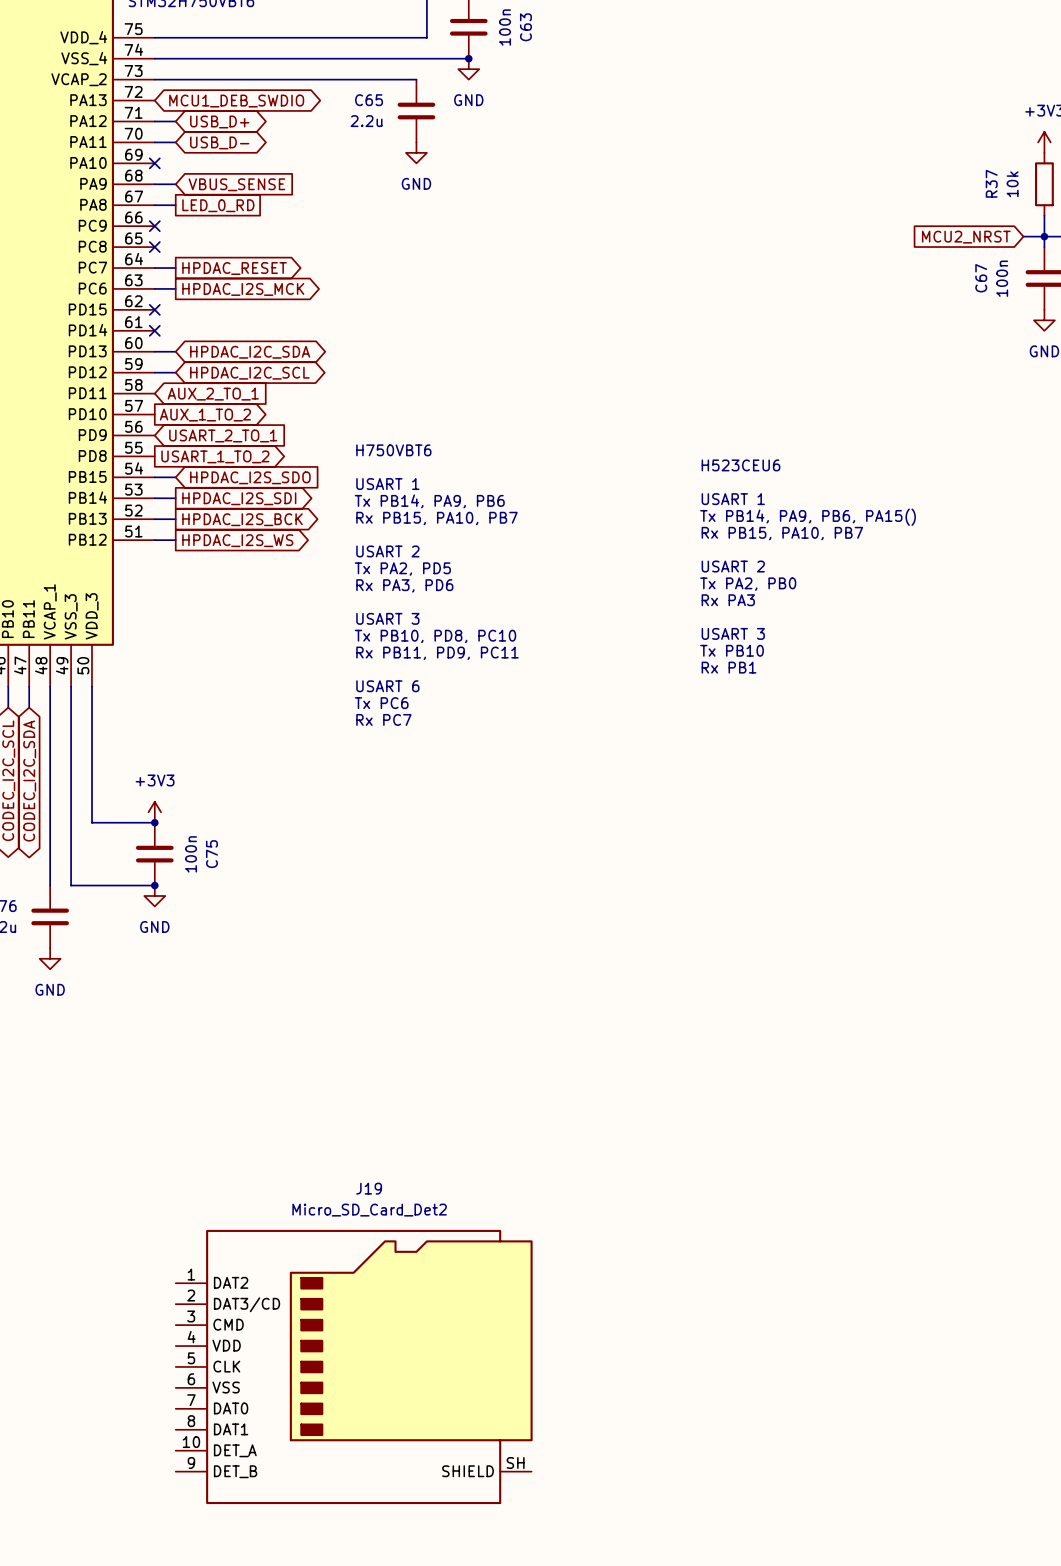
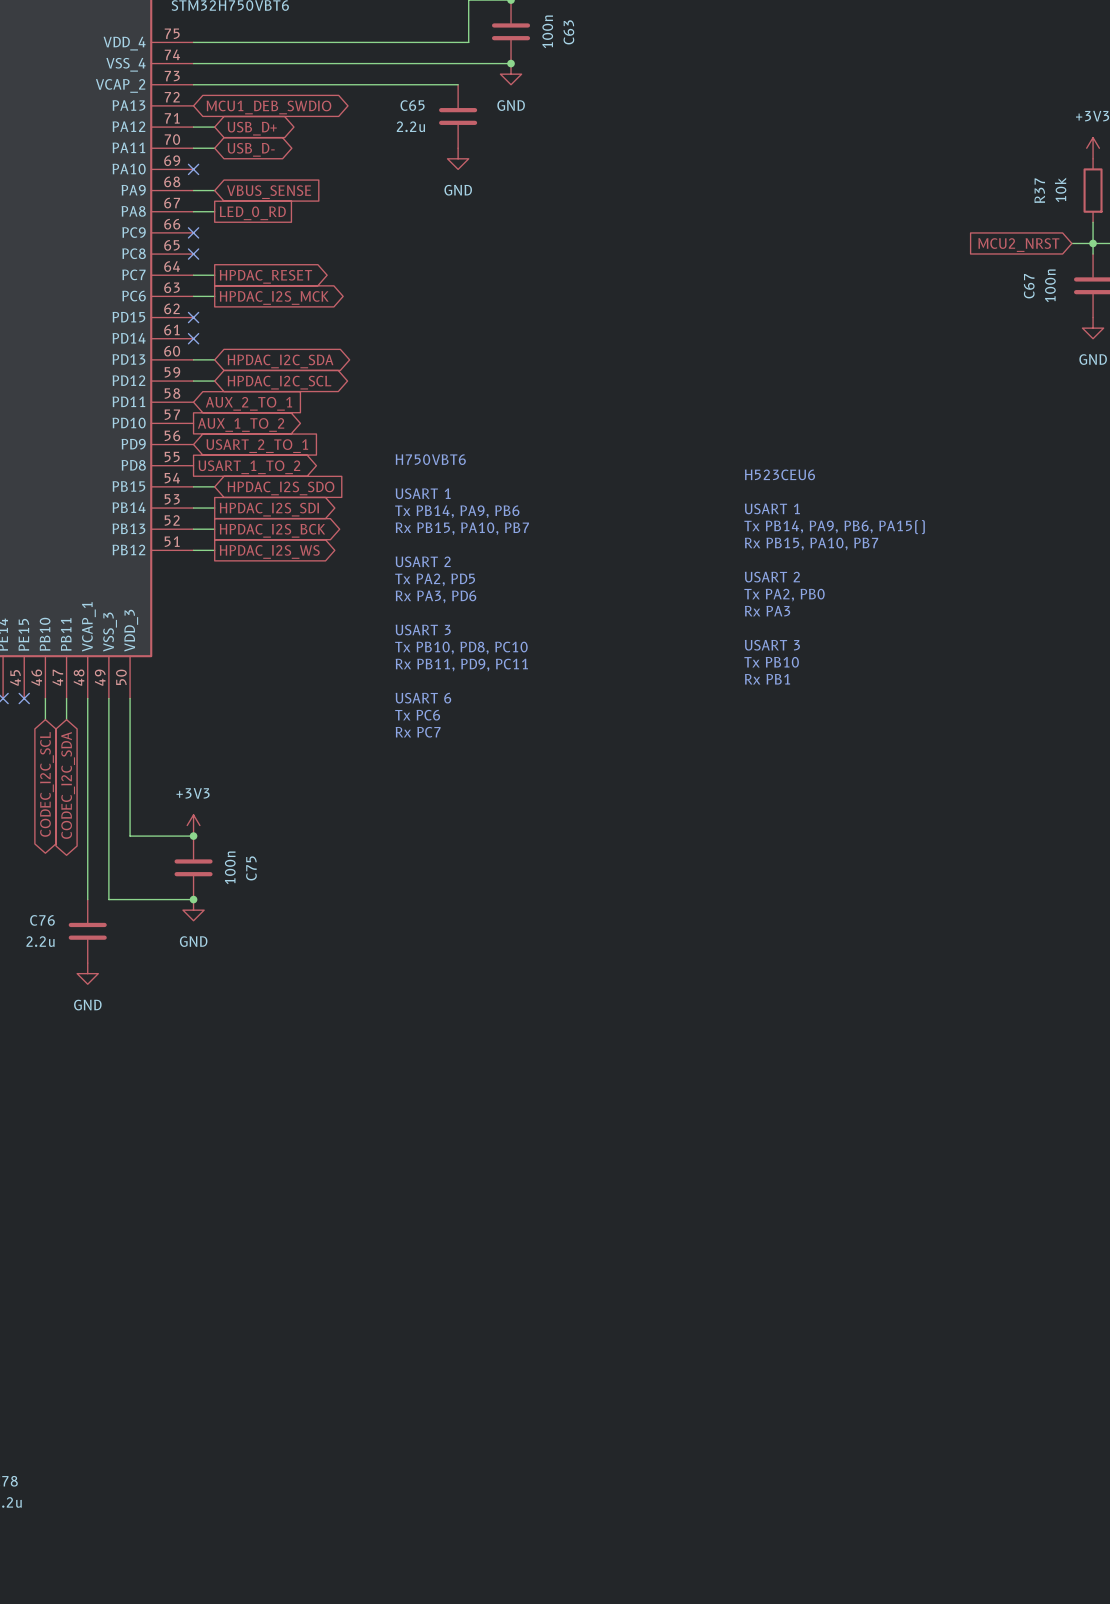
J19: Micro_SD_Card_Det2 (354, 1366) -> none

